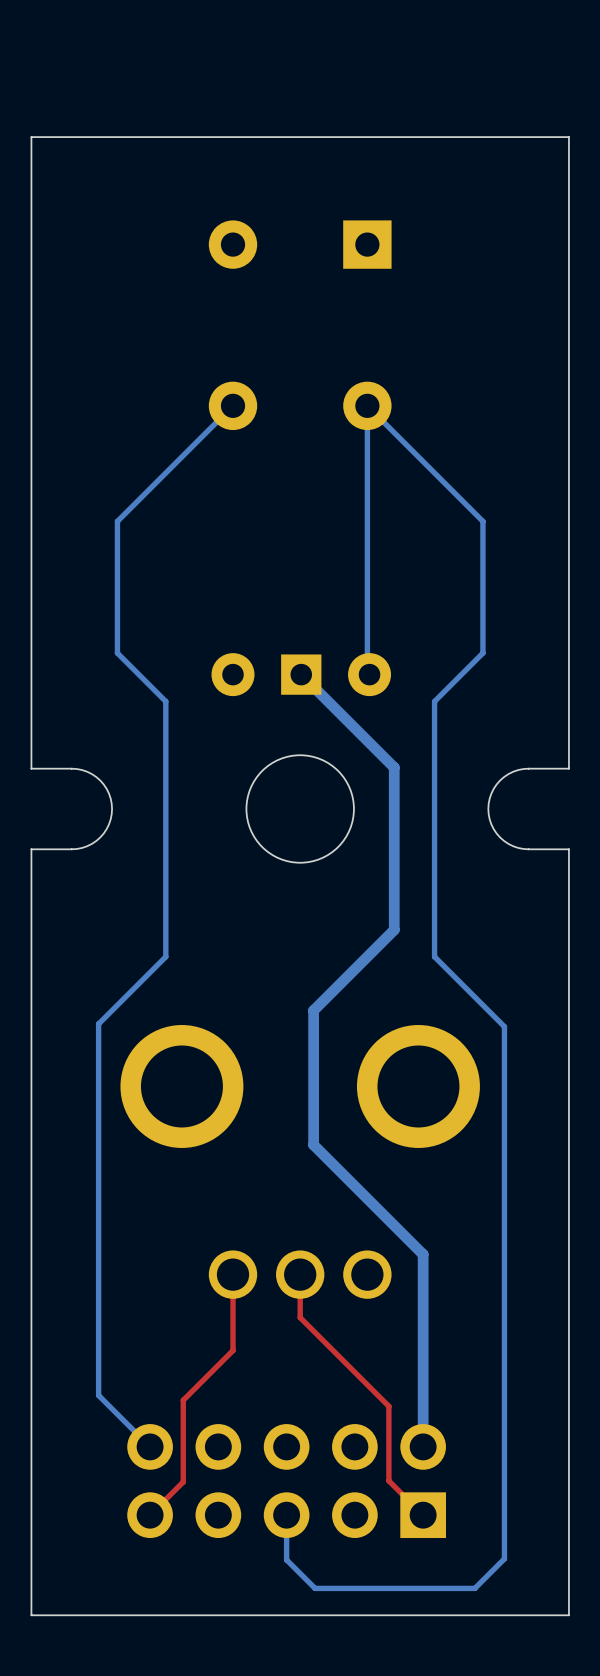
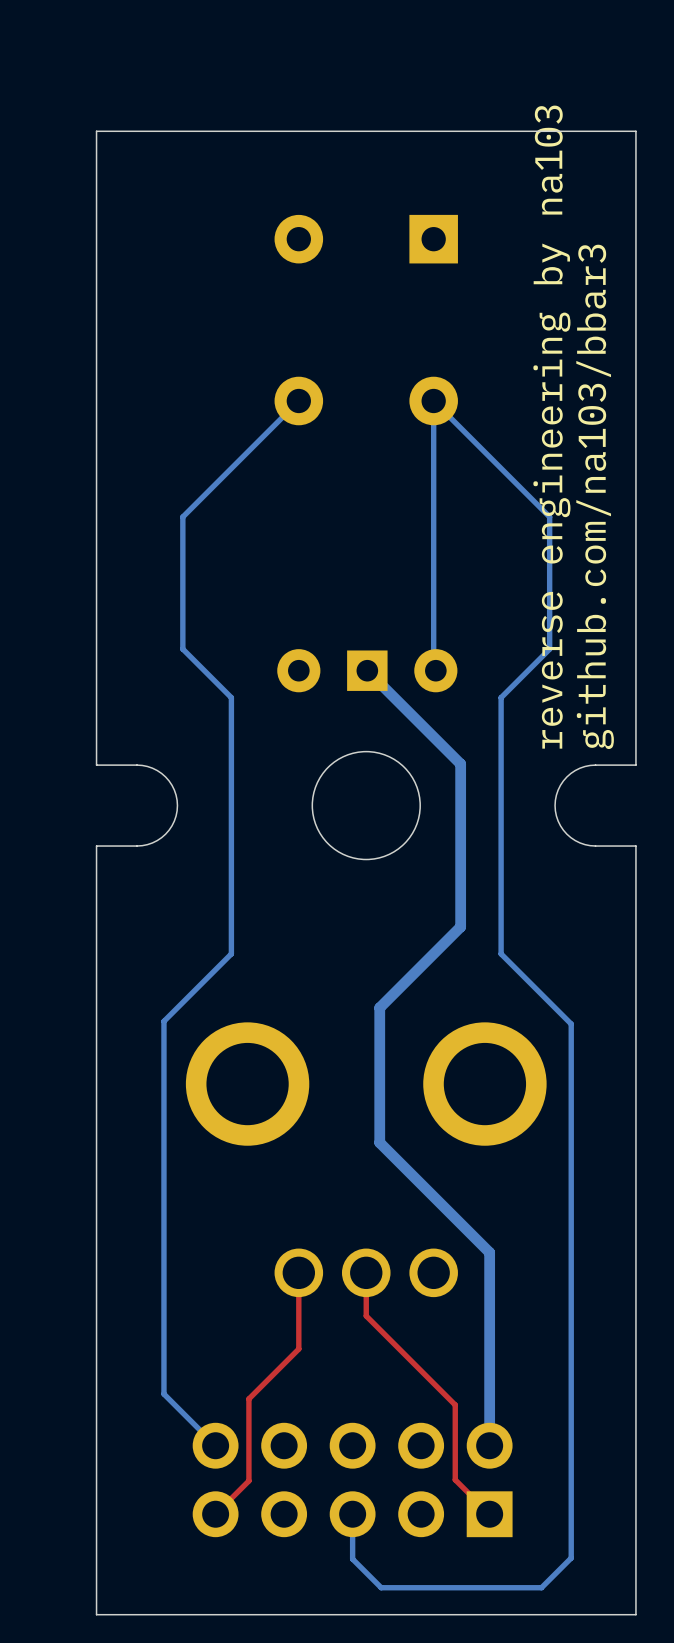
text: none -> reverse engineering by na103 (551, 427)
text: none -> github.com/na103/bbar3 (595, 496)

